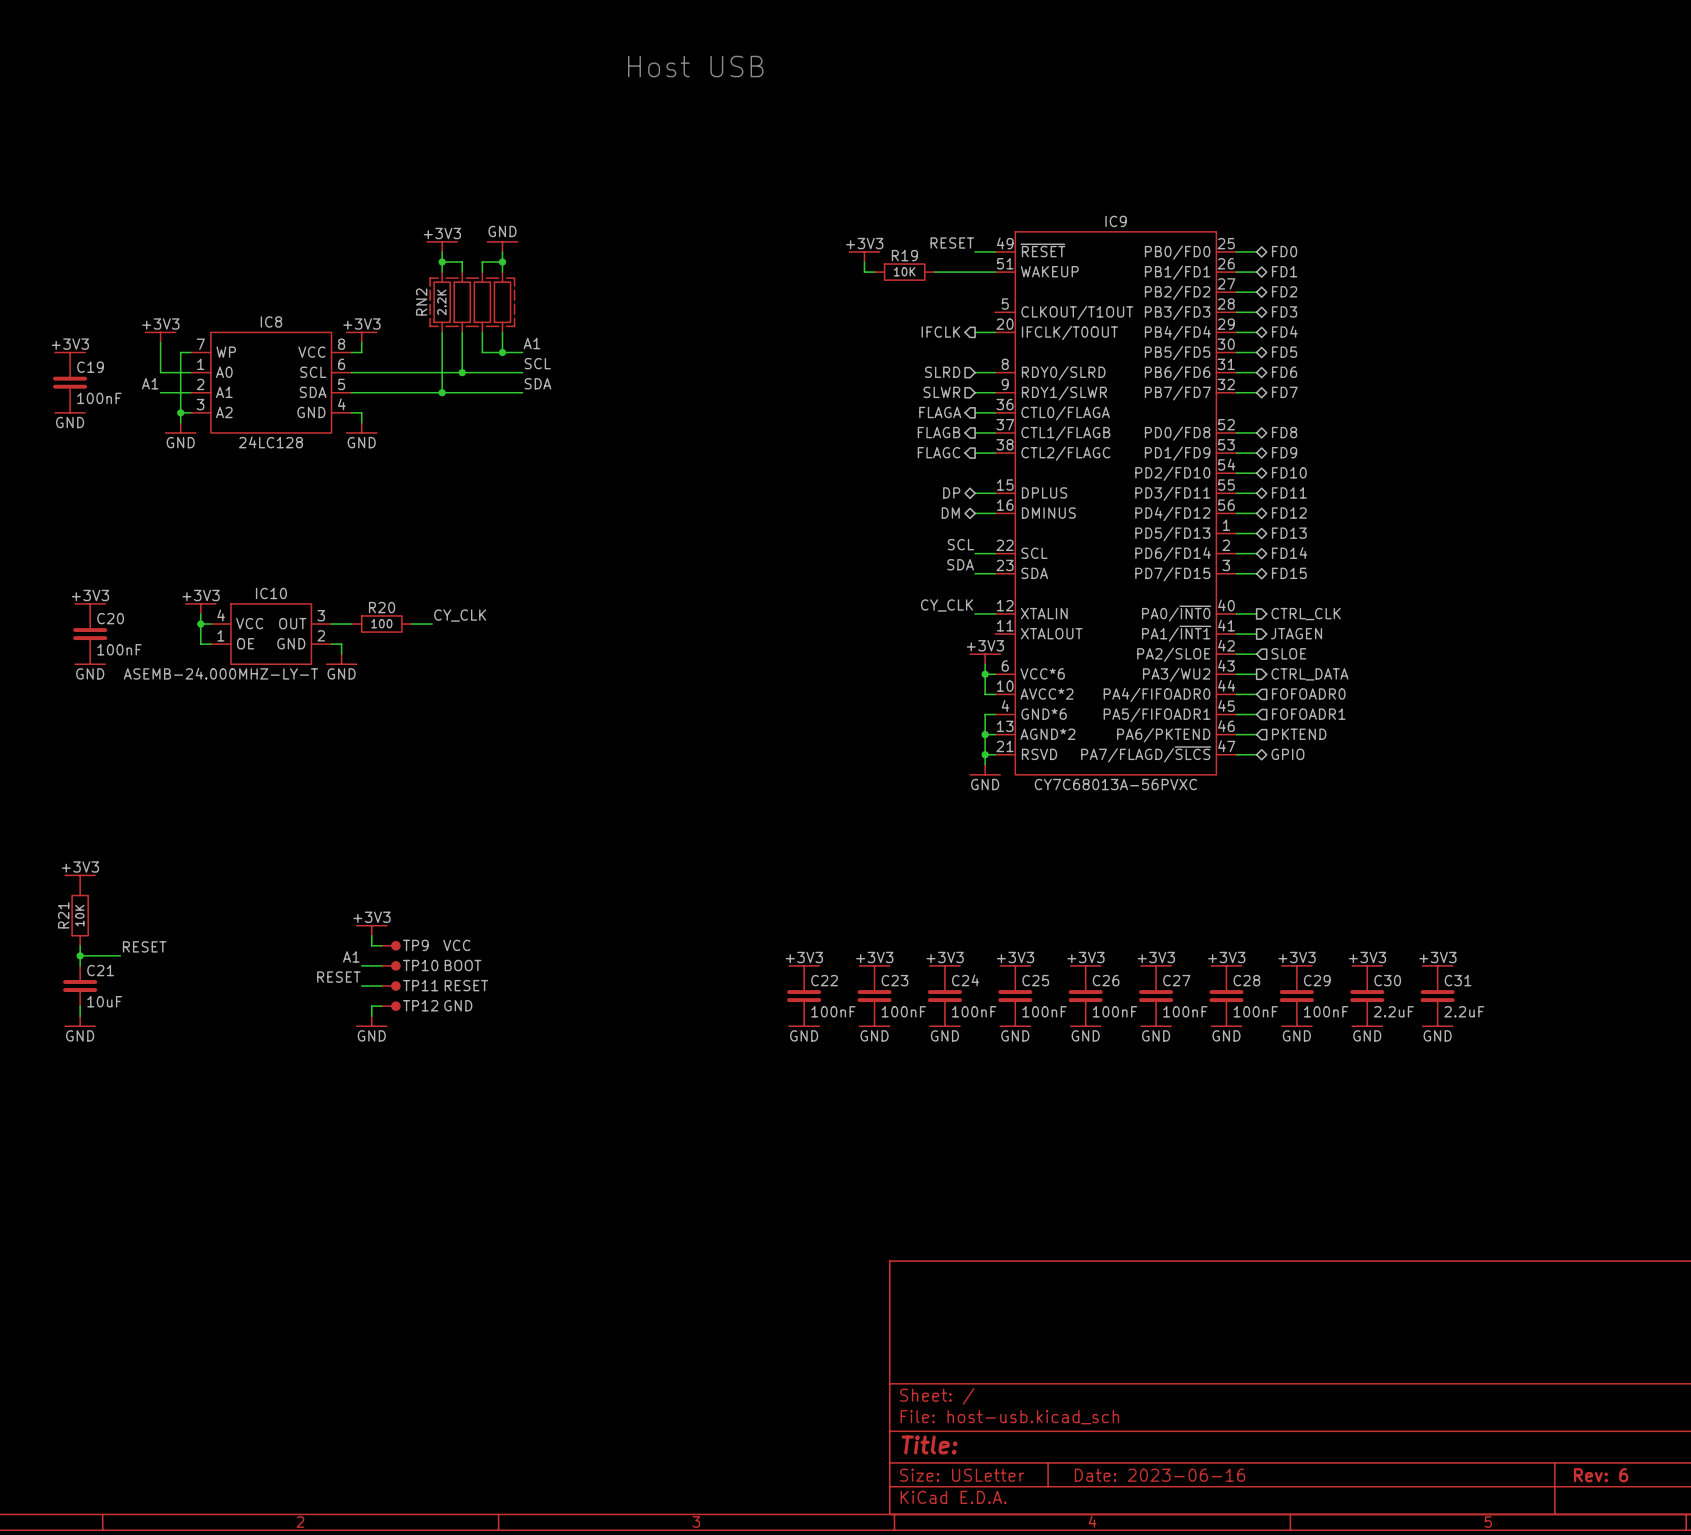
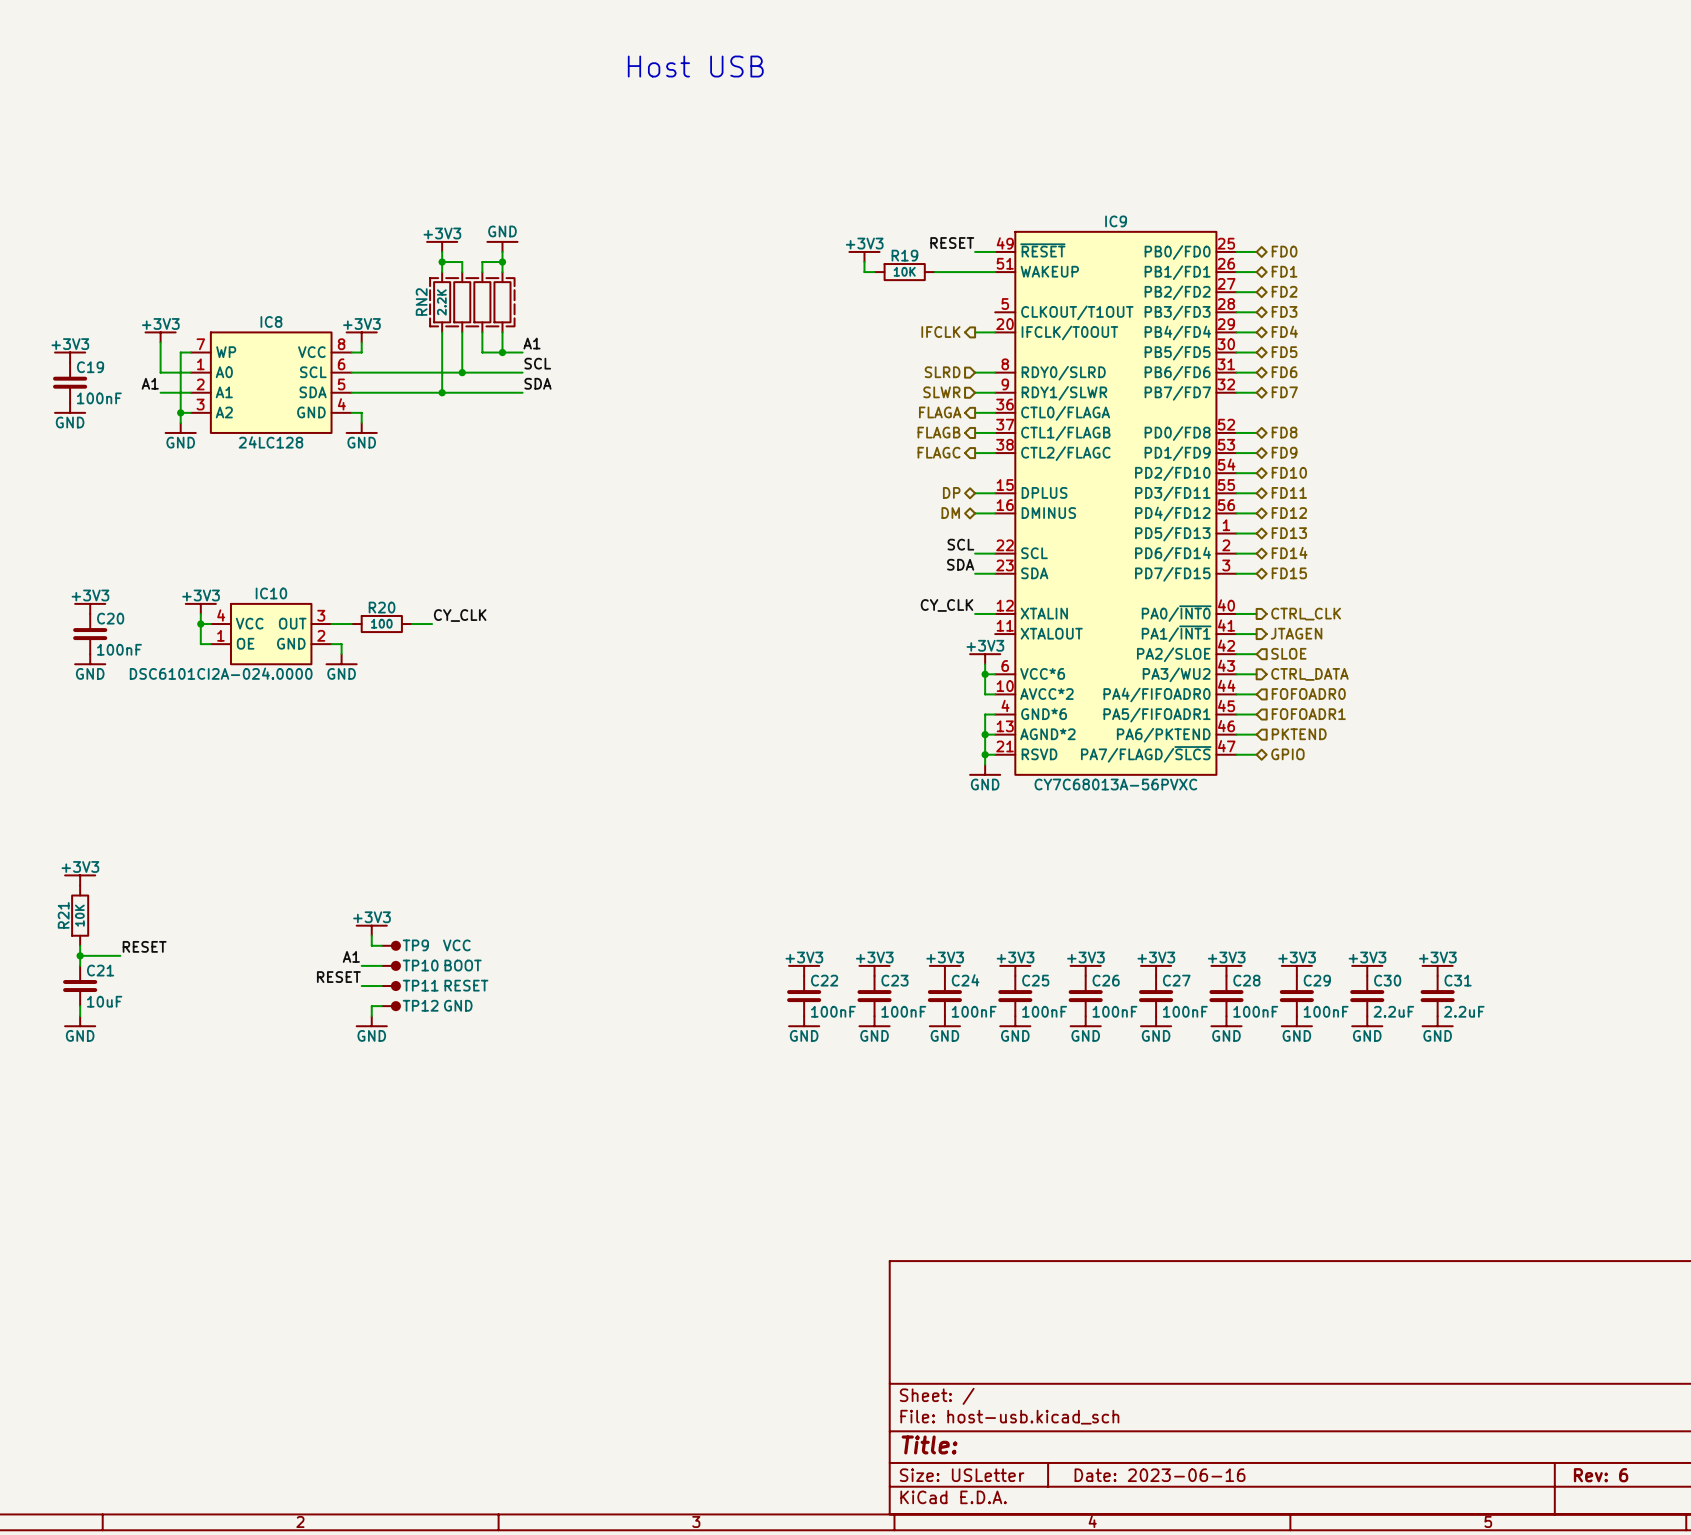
IC10 value: ASEMB-24.000MHZ-LY-T (220, 673) -> DSC6101CI2A-024.0000 (221, 673)

